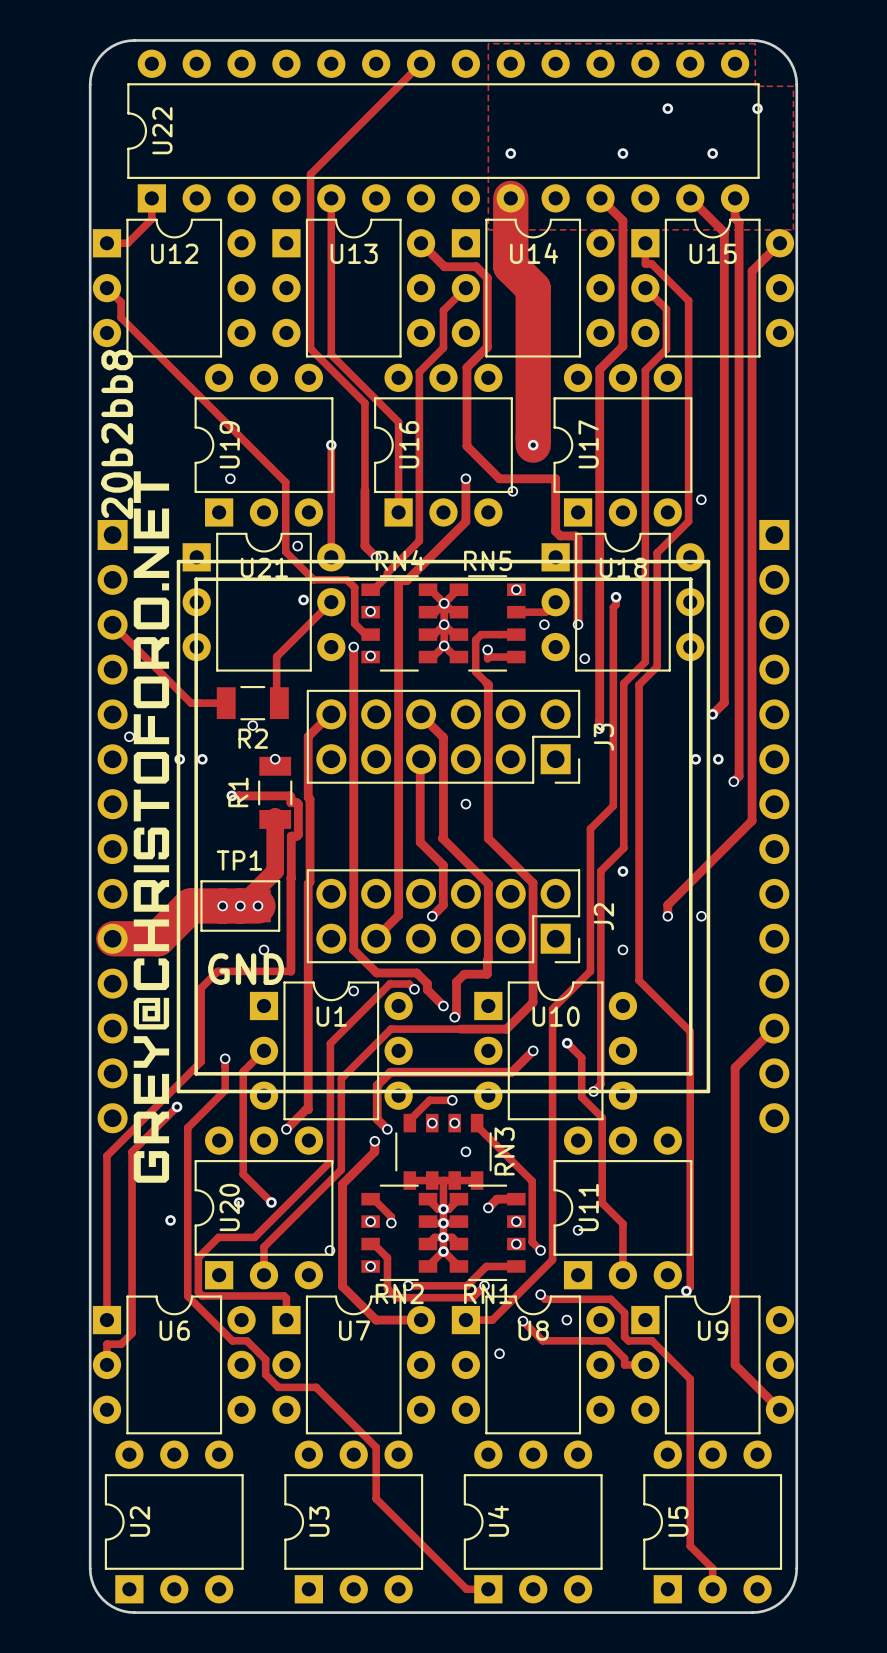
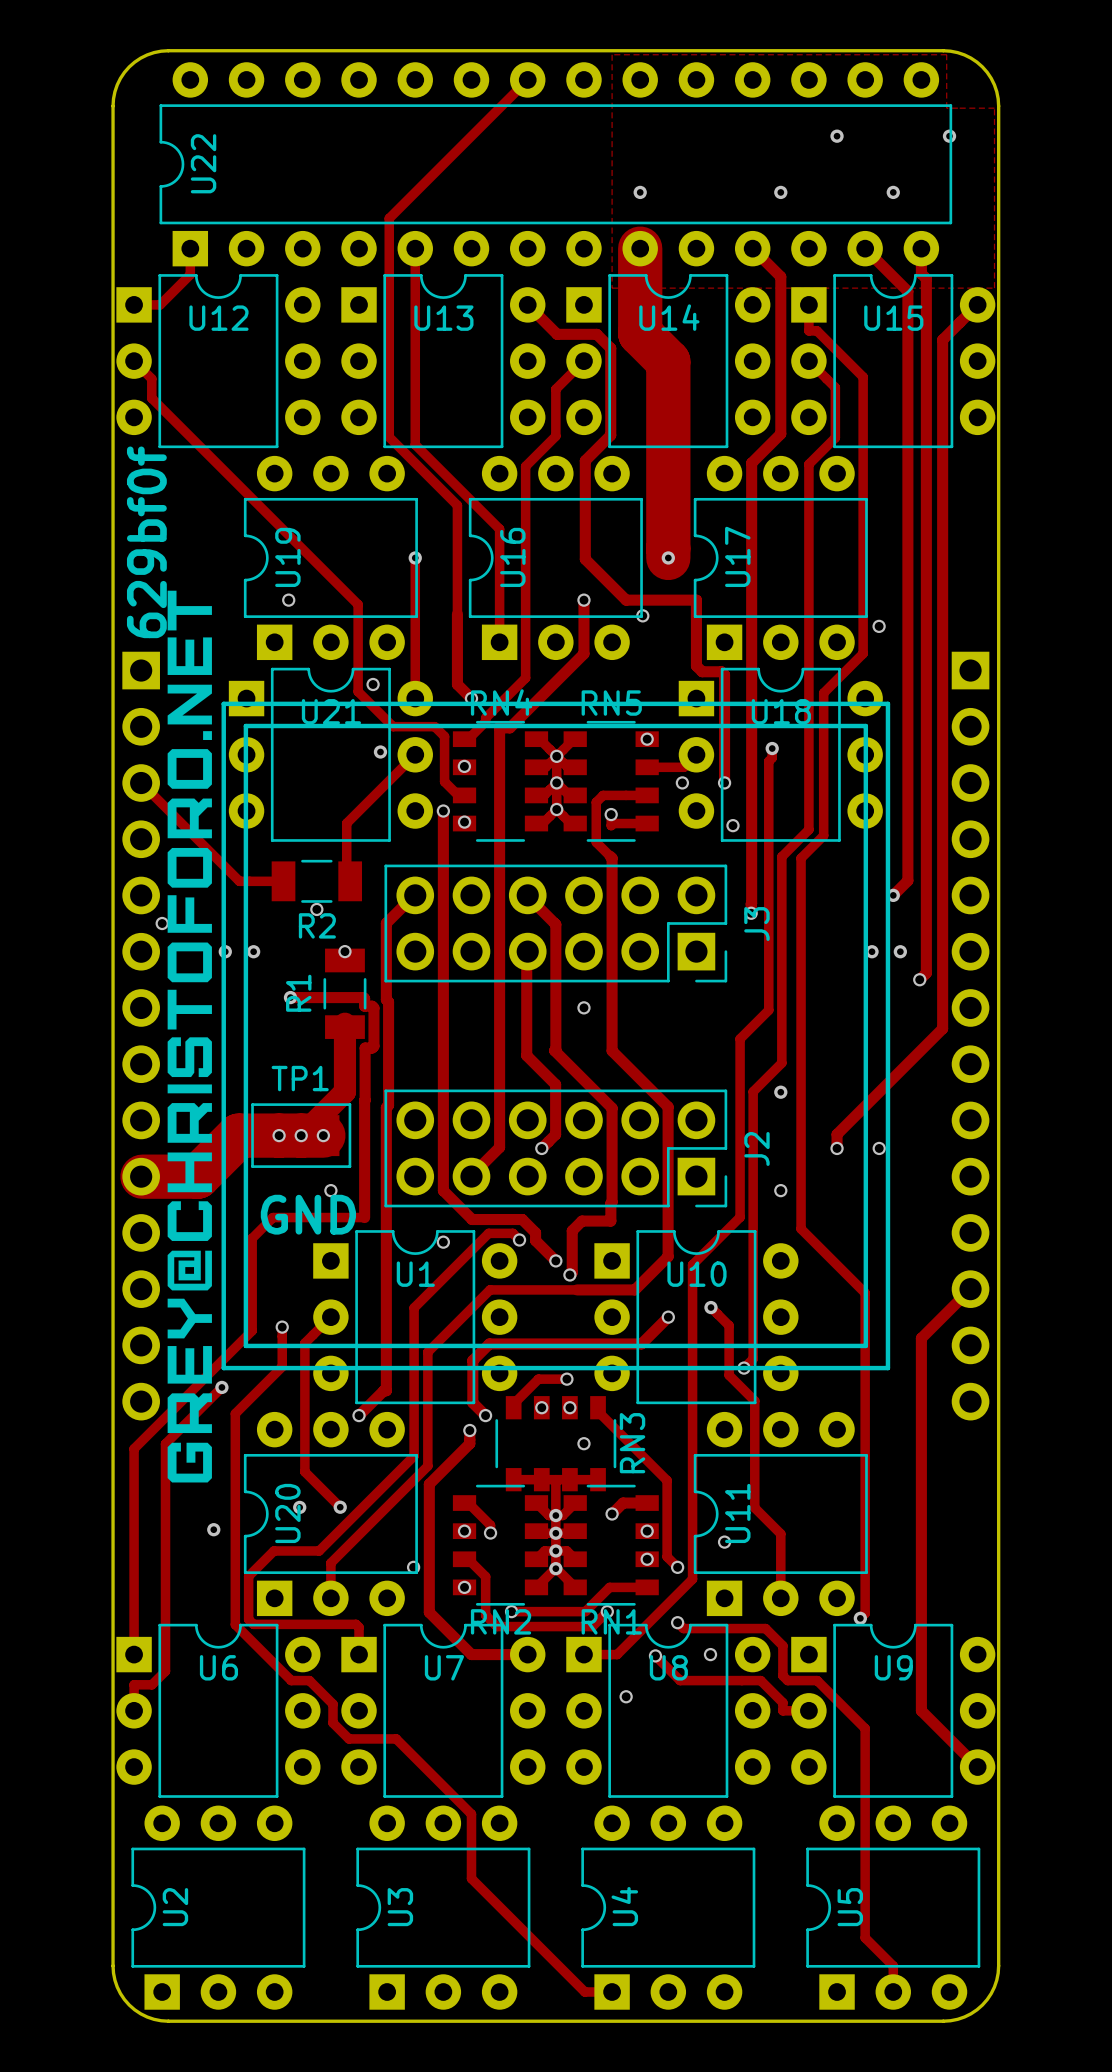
text: 20b2bb8 (117, 434) -> 629bf0f (146, 542)

